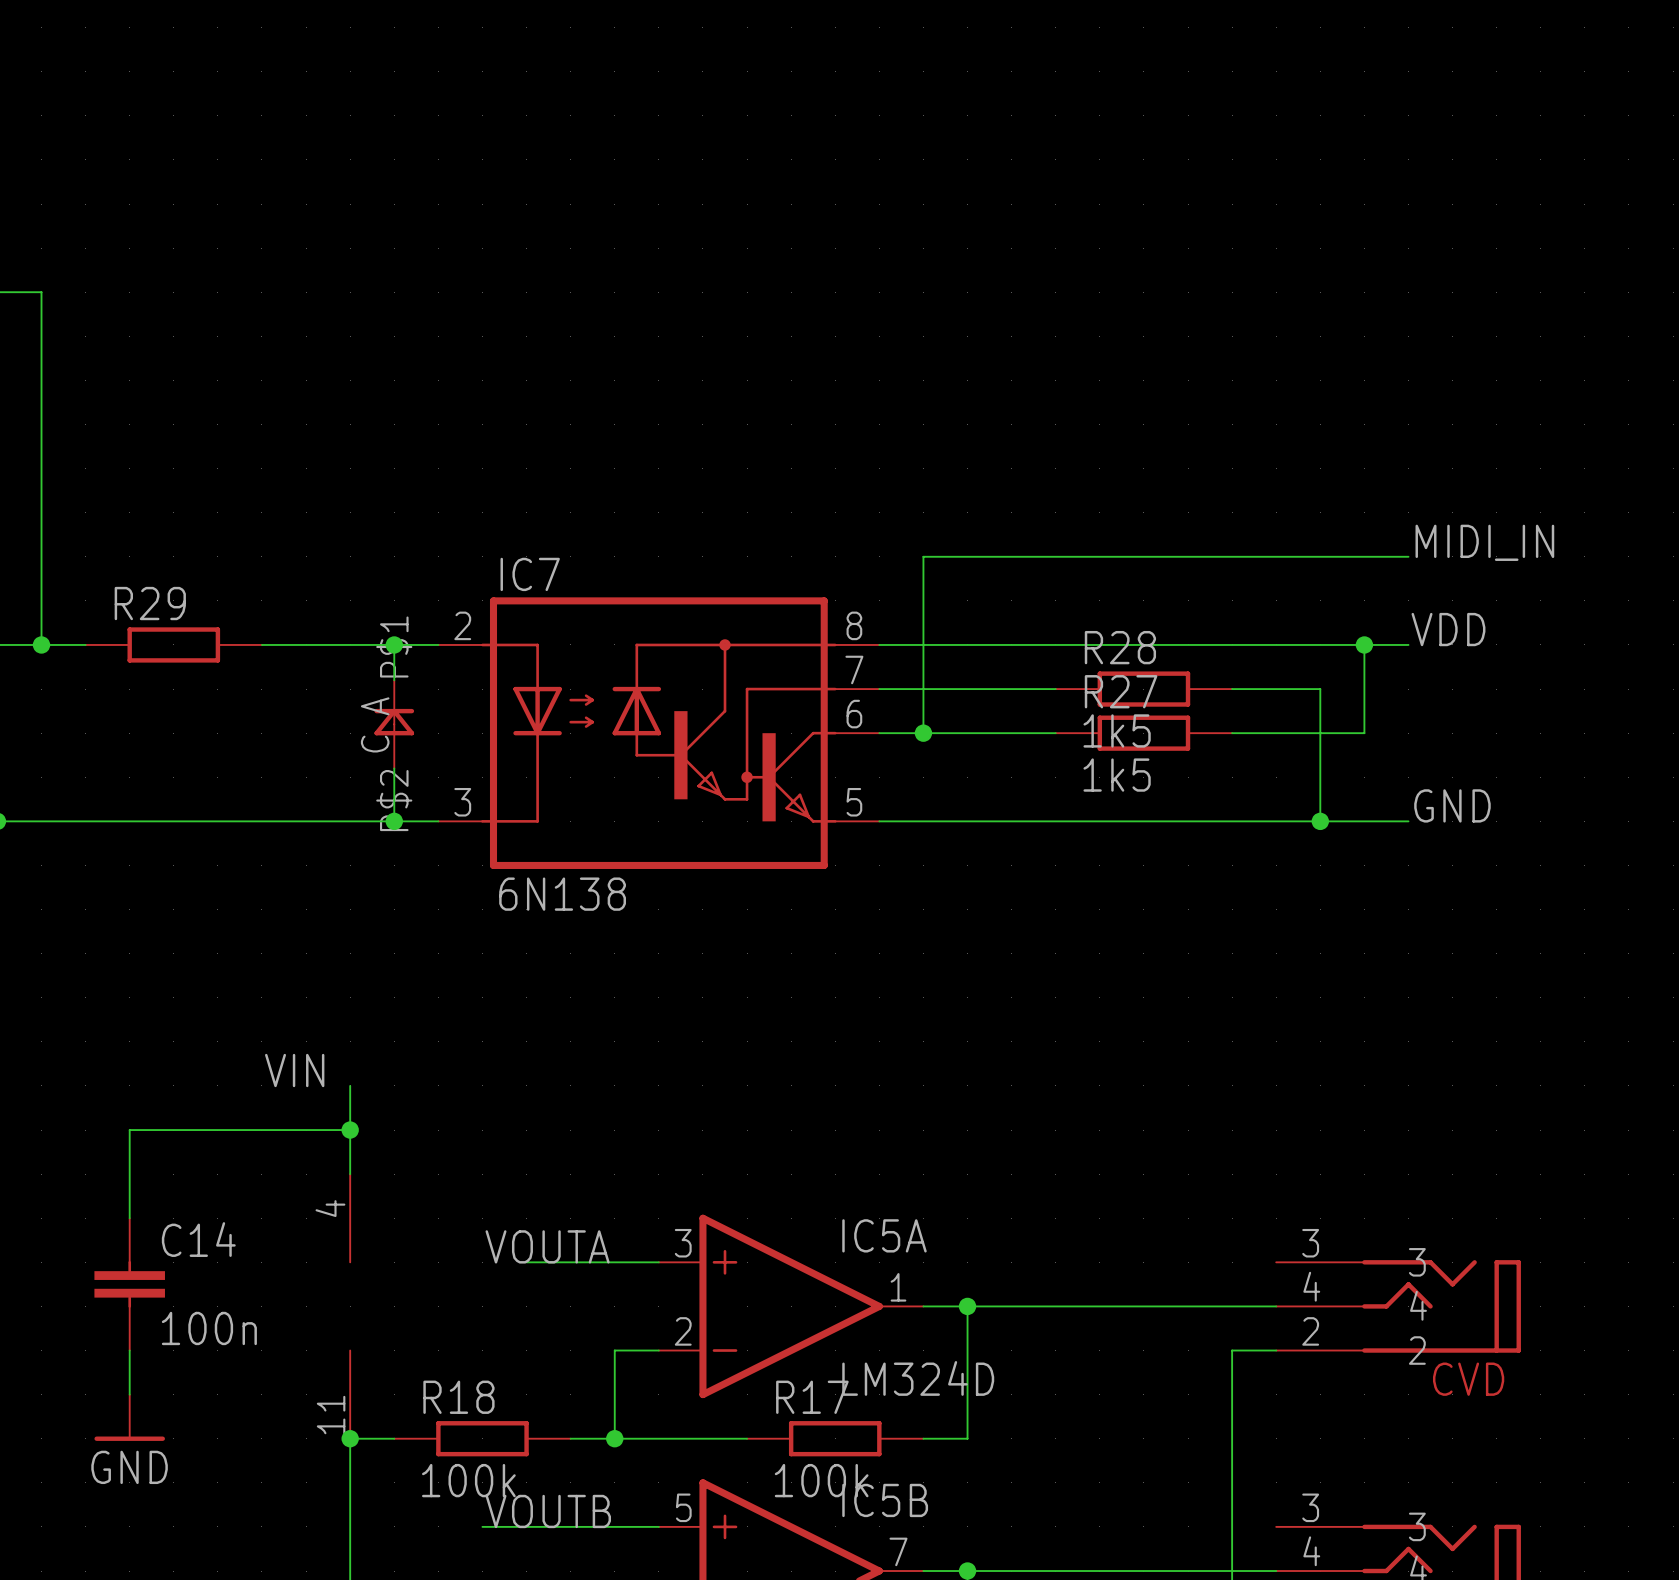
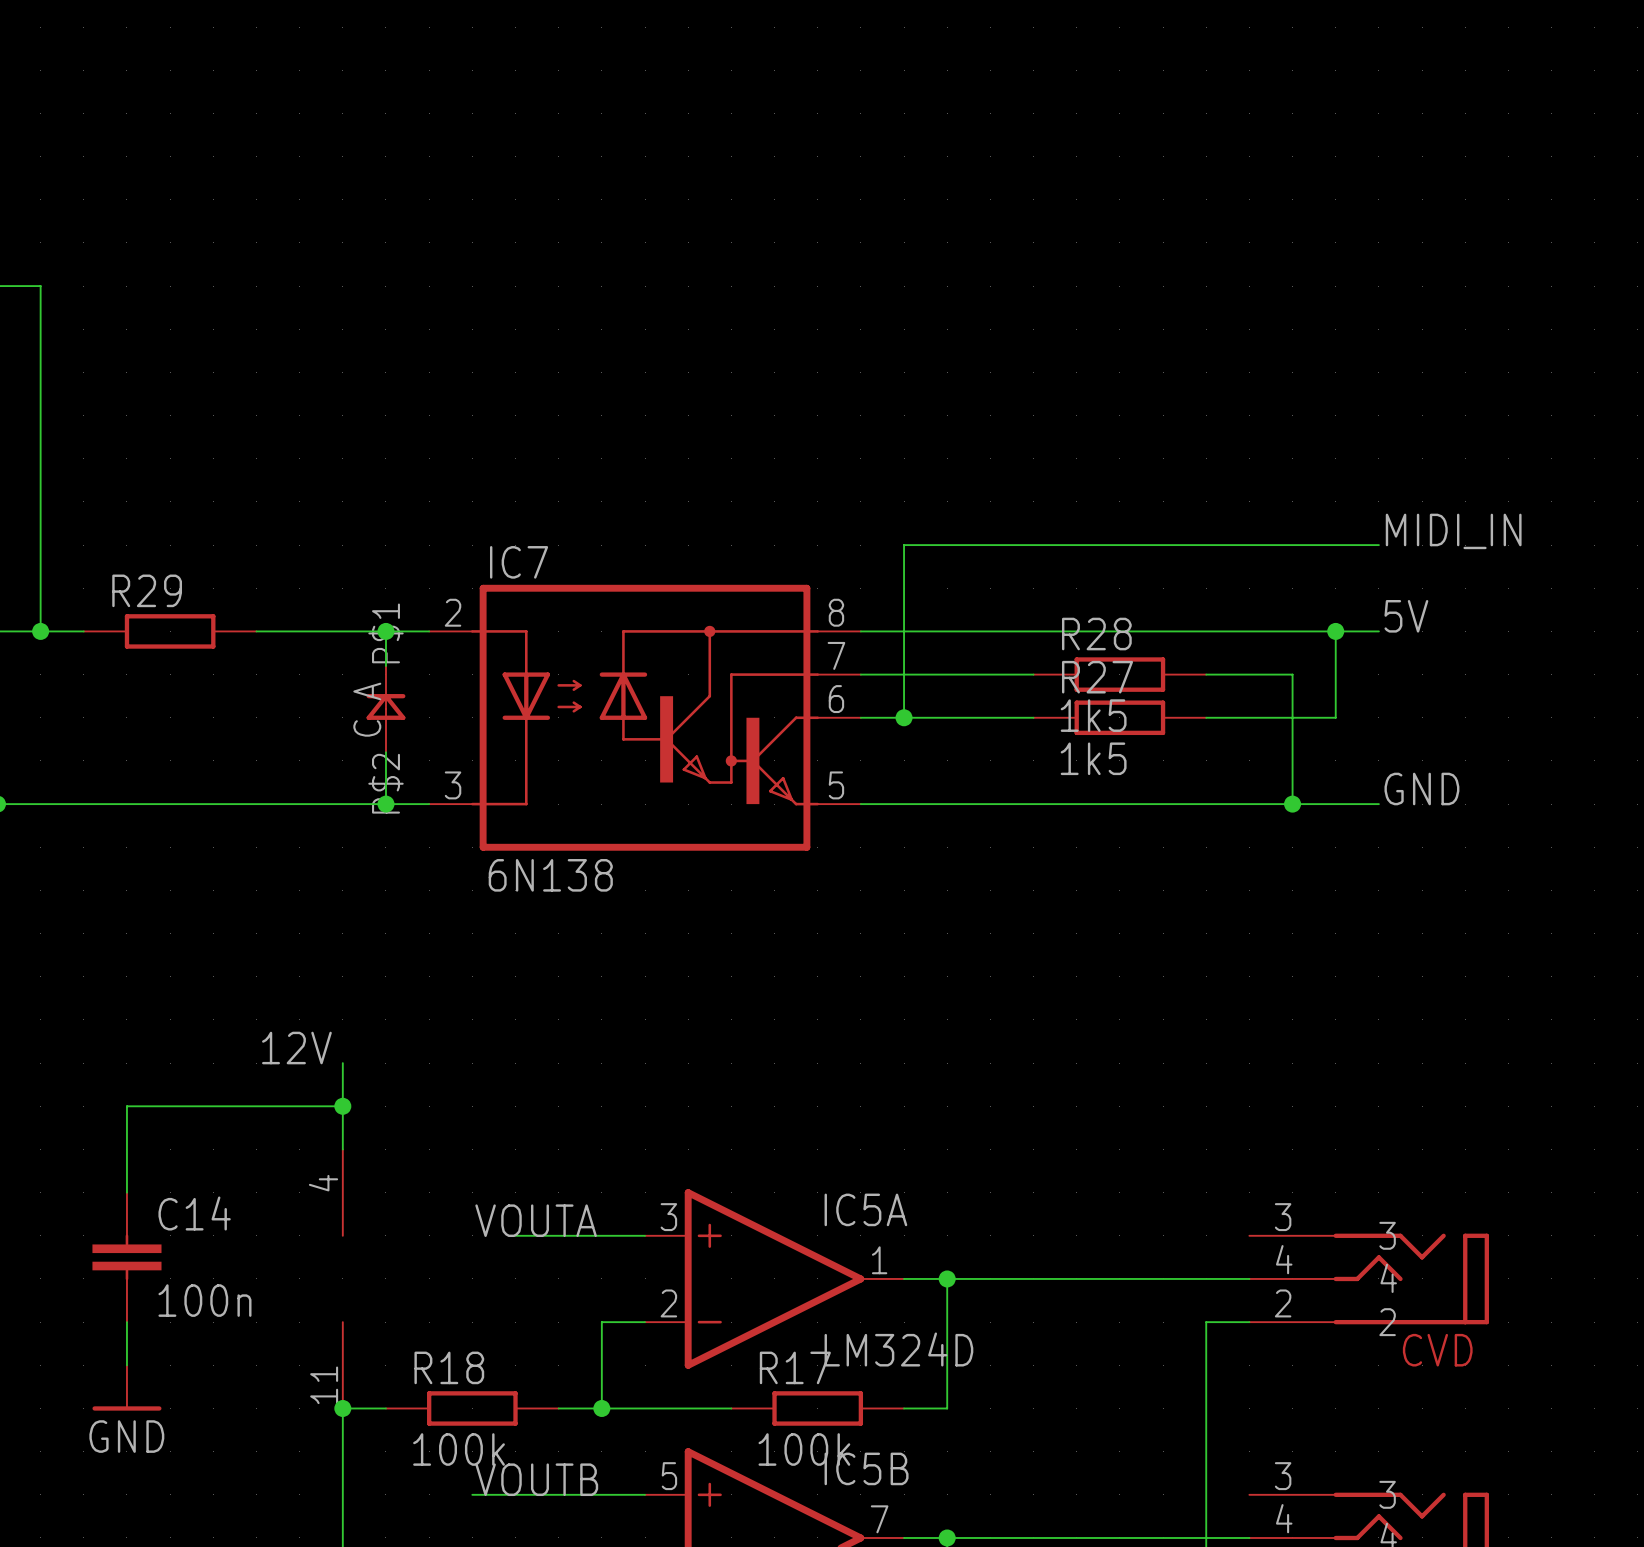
label: VDD (1448, 629) -> 5V (1406, 616)
label: VIN (294, 1070) -> 12V (296, 1048)

